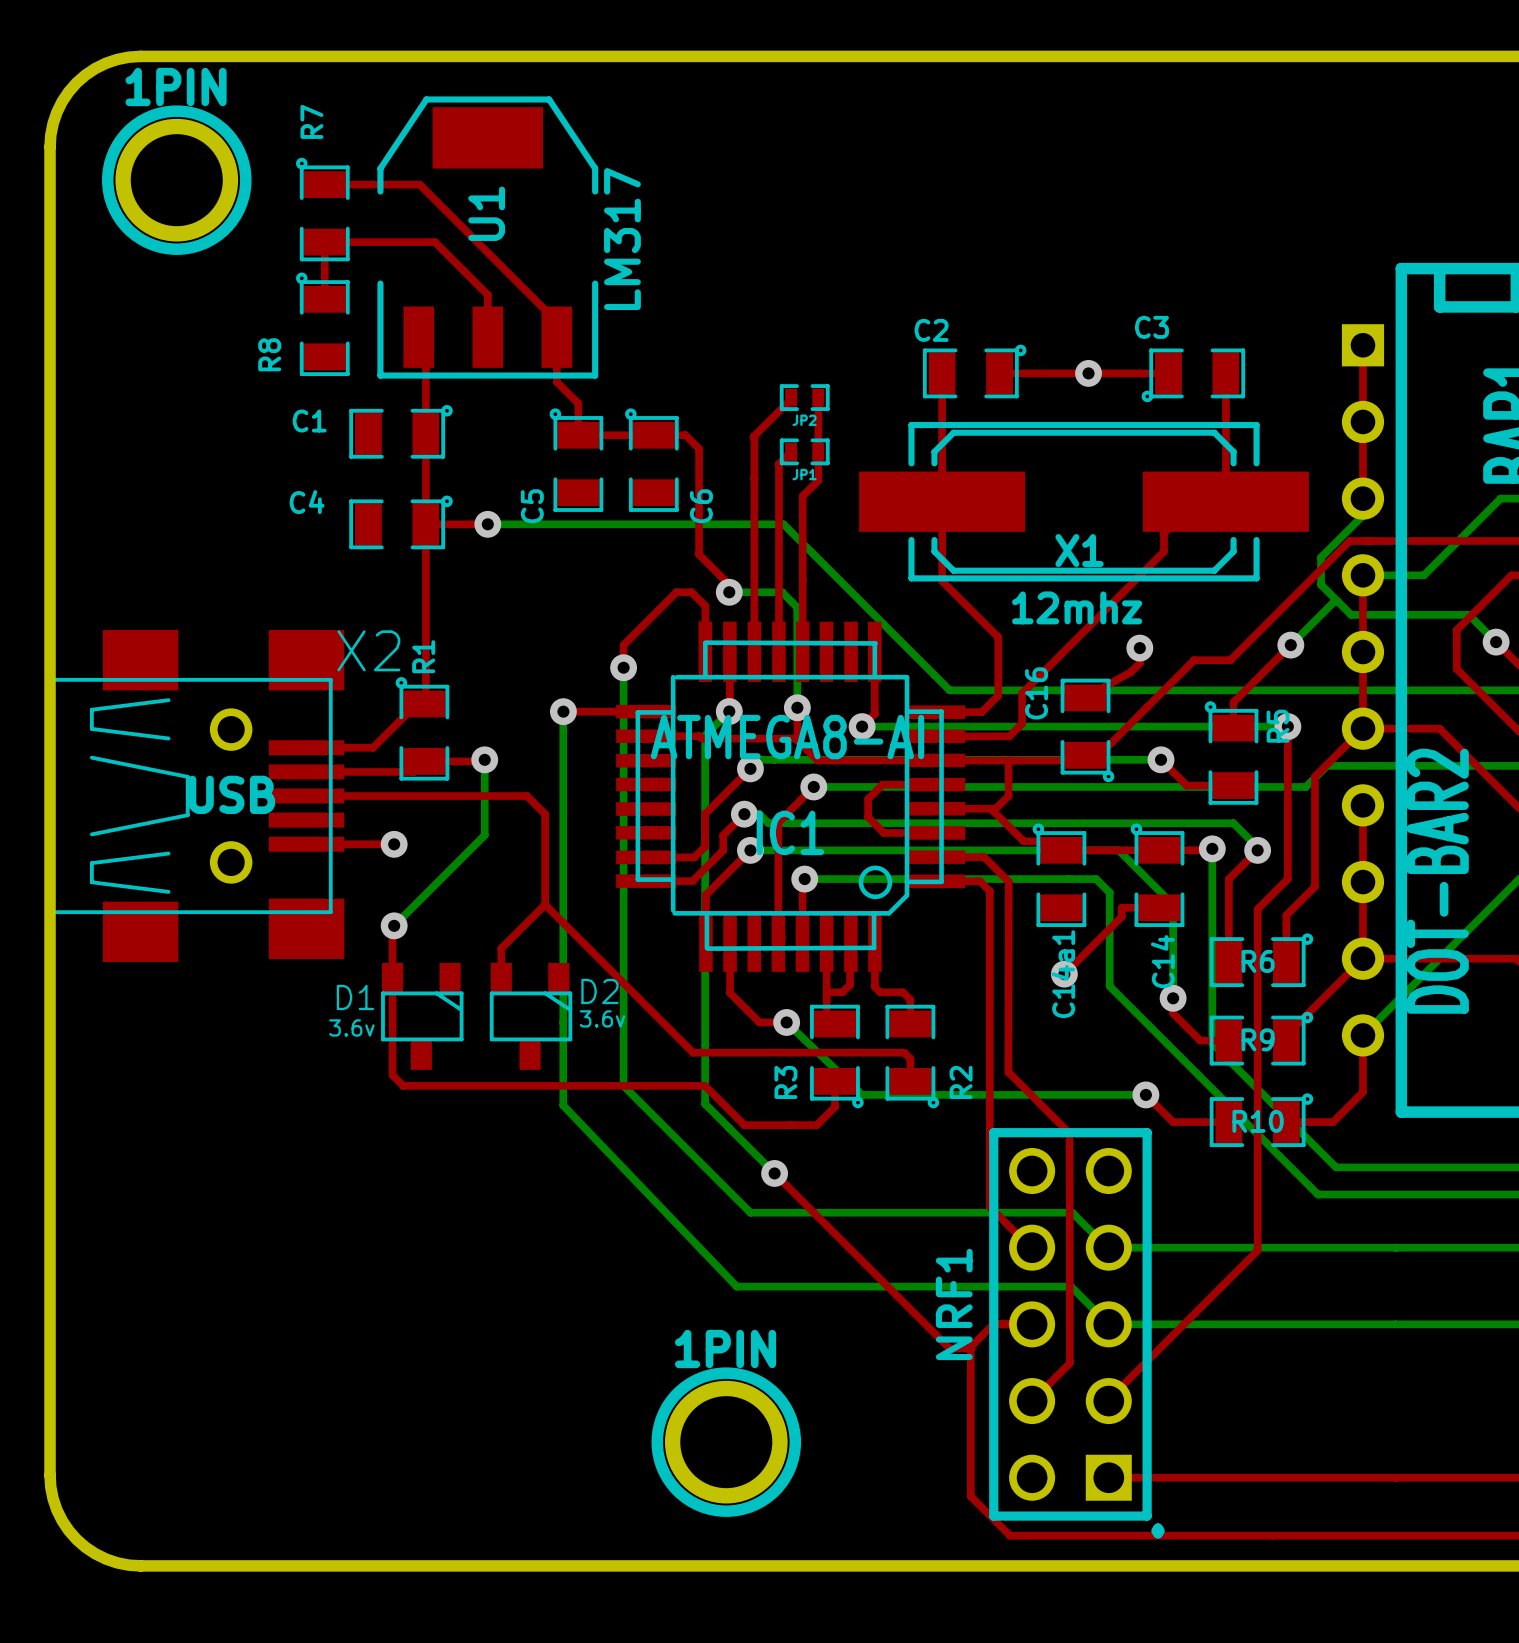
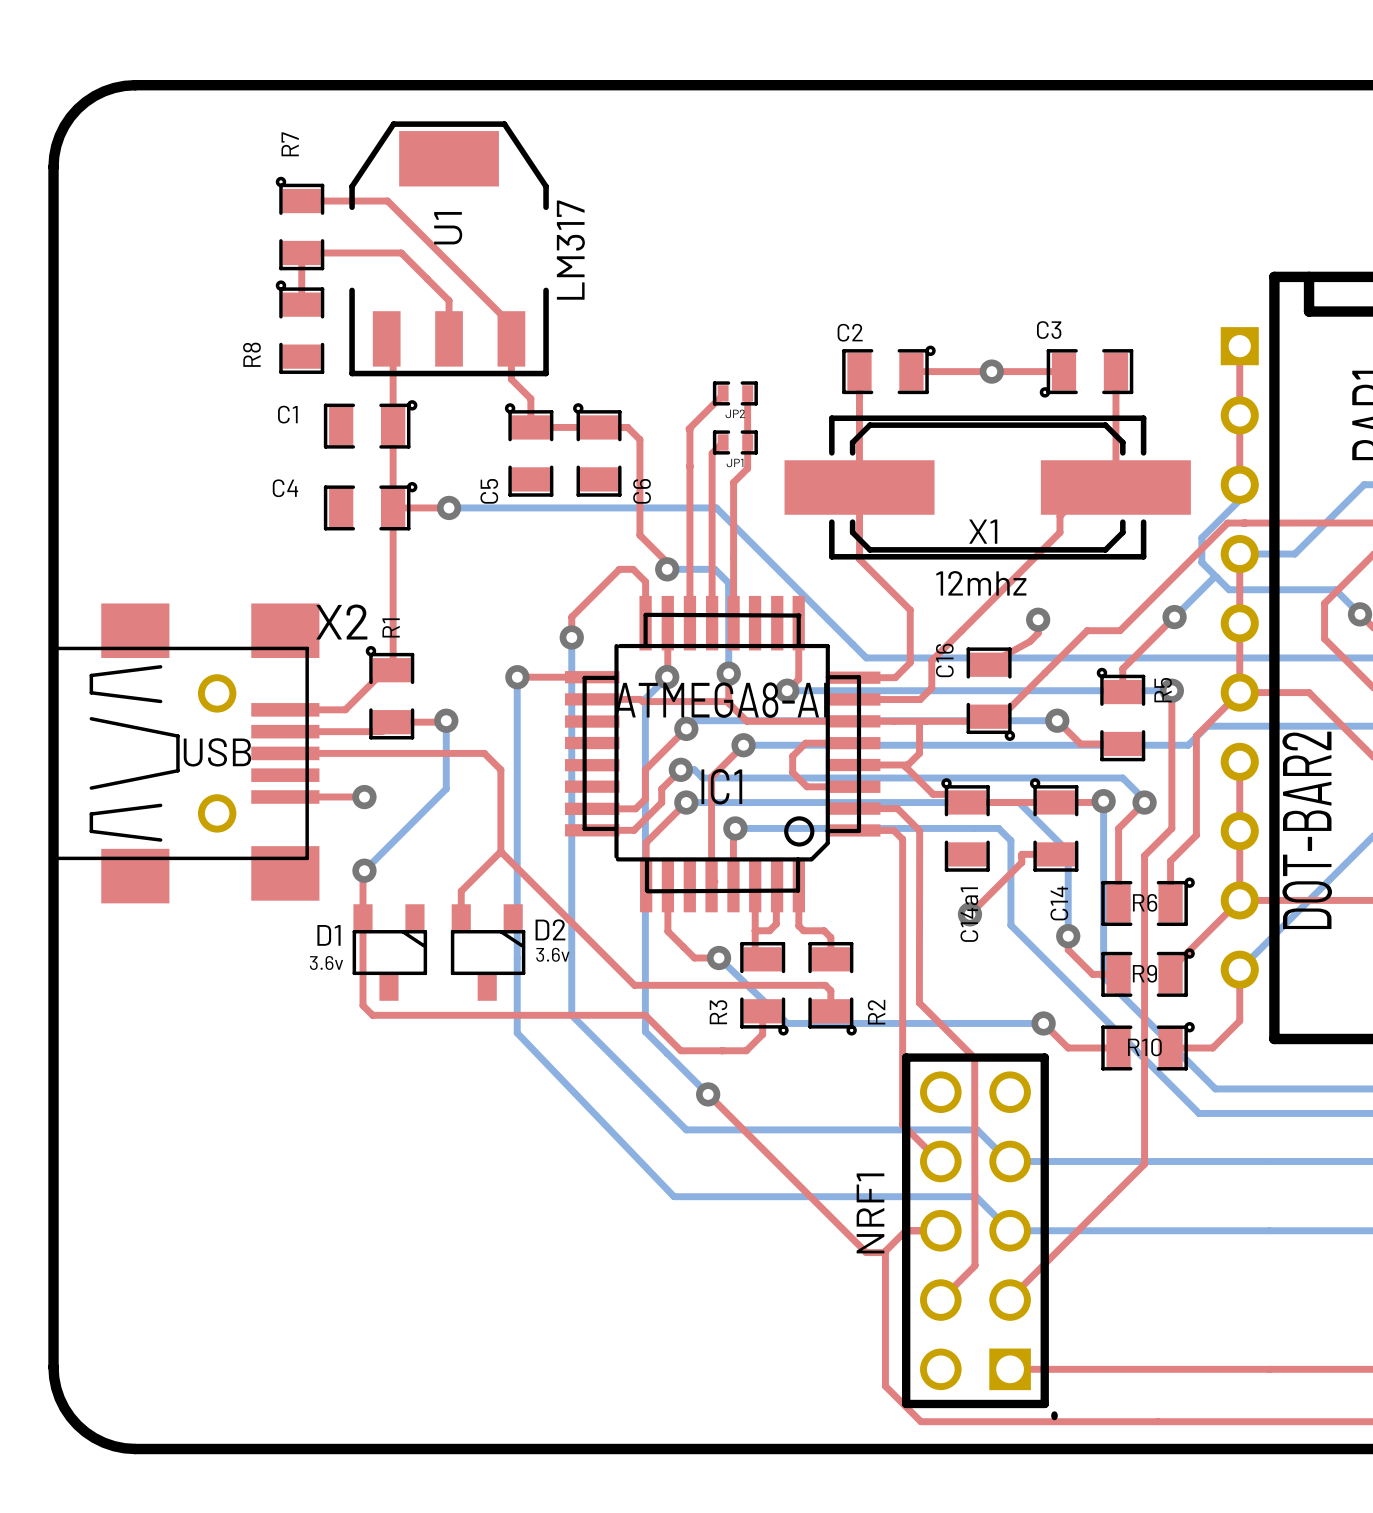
1PIN: (176, 180) -> none
1PIN: (726, 1442) -> none

